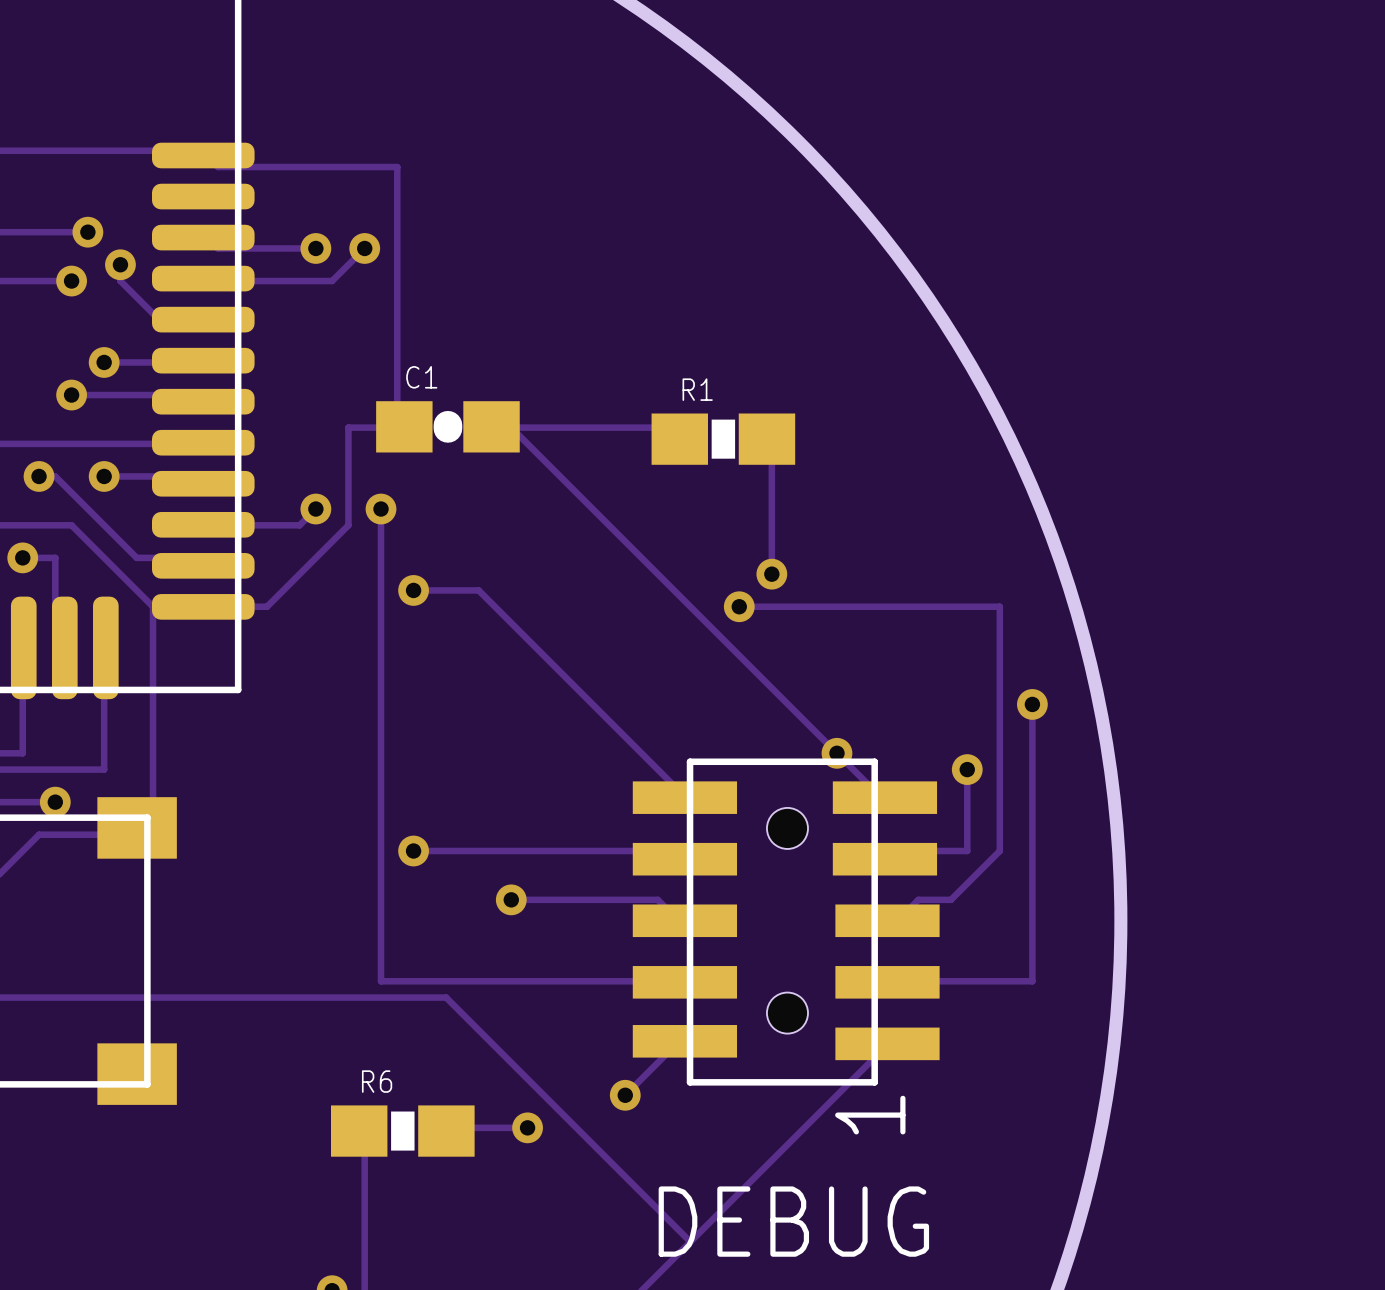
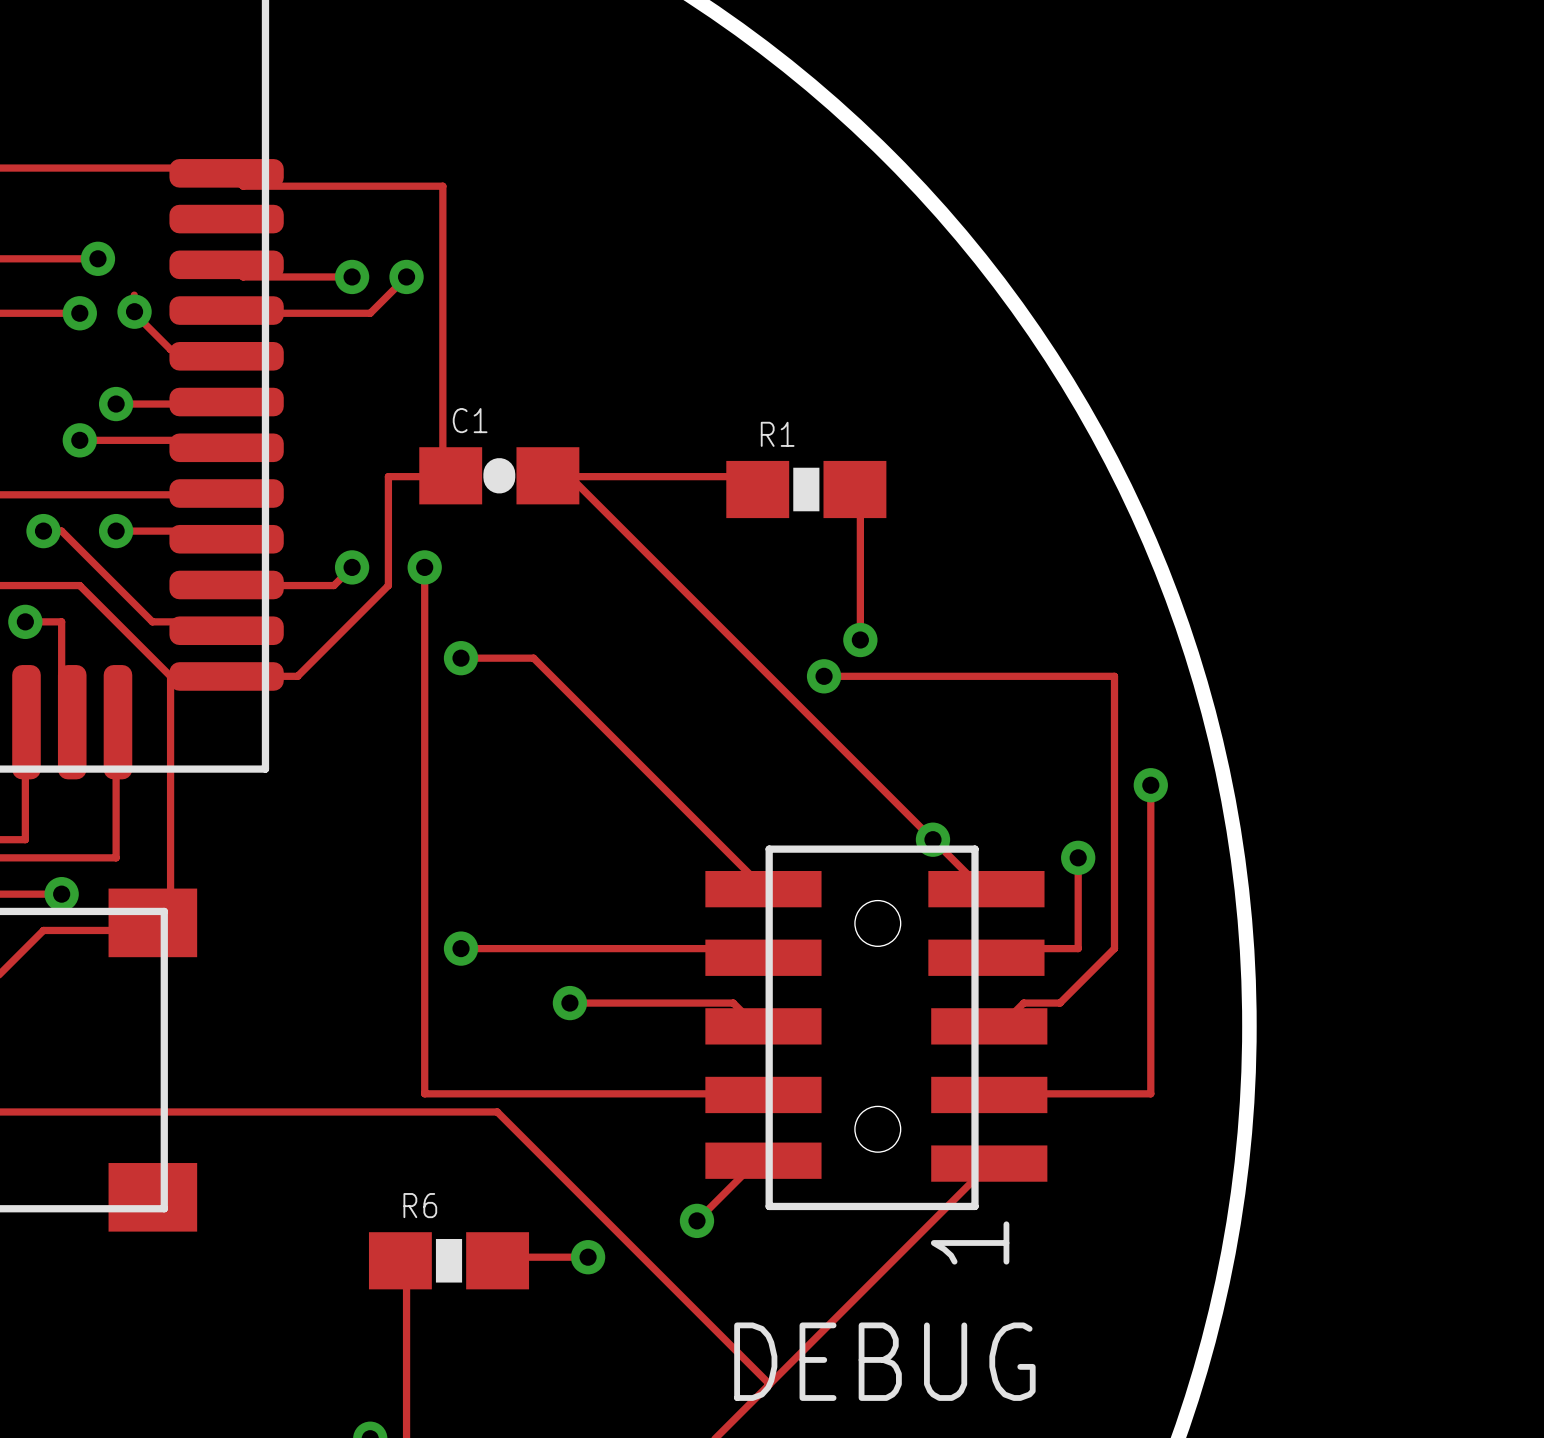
via position: (120, 264) -> (134, 311)

